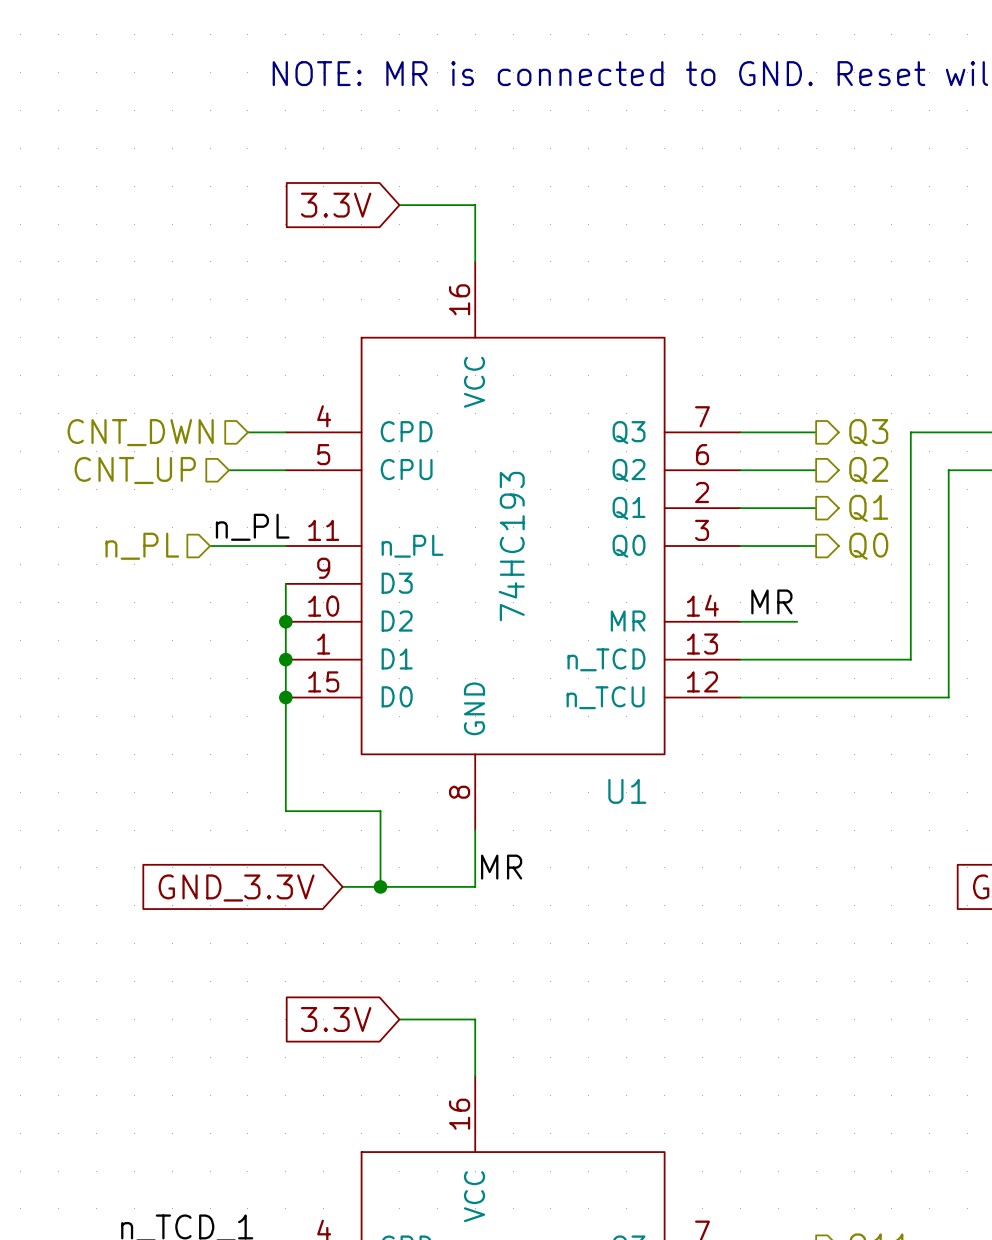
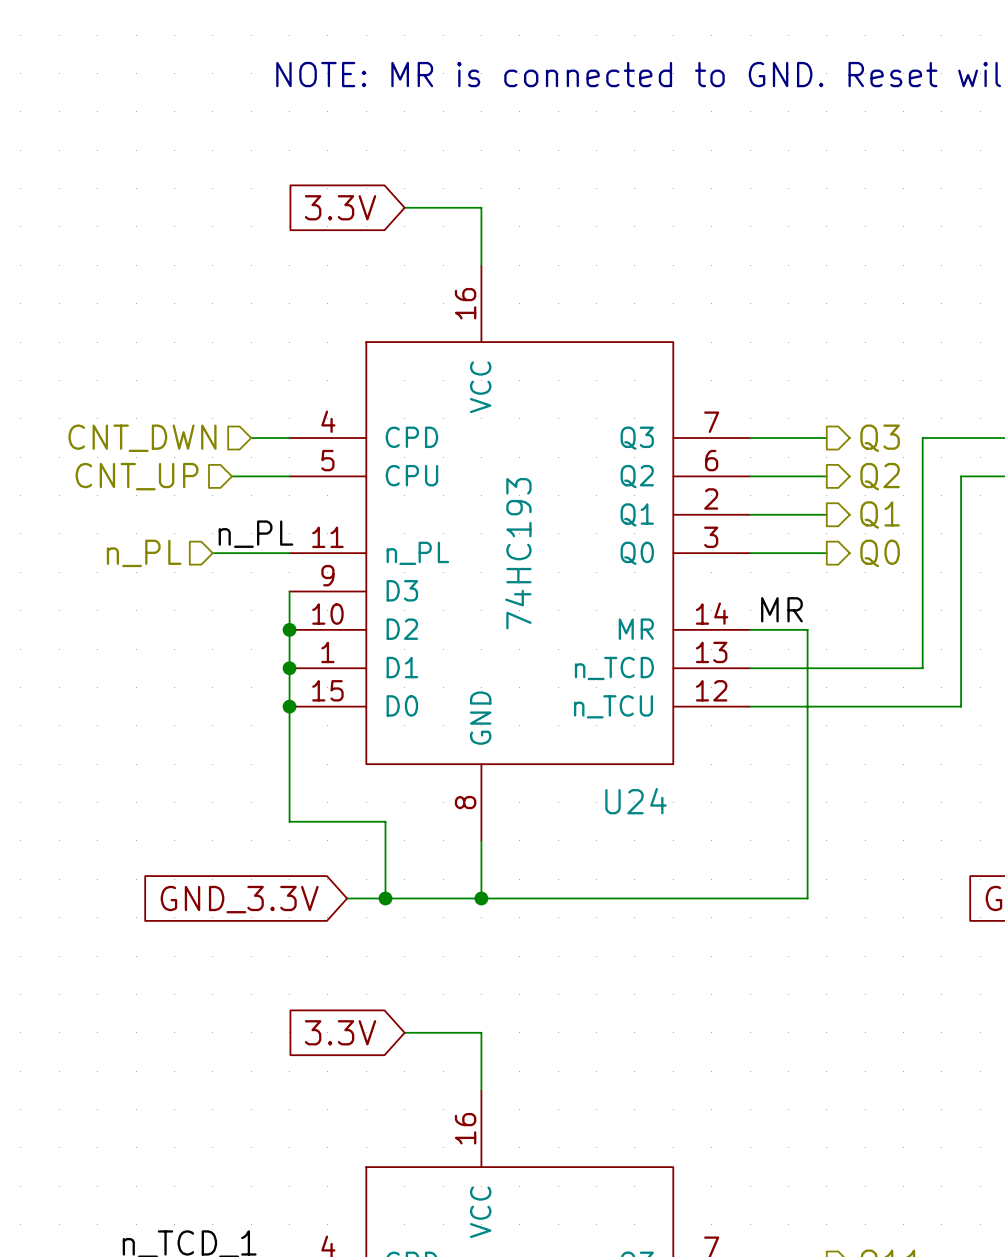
wire: none -> (807, 629) (807, 898) (481, 898)
U1 name: U1 (627, 791) -> U24 (636, 801)
label: MR (501, 867) -> none
junction: none -> (481, 898)

